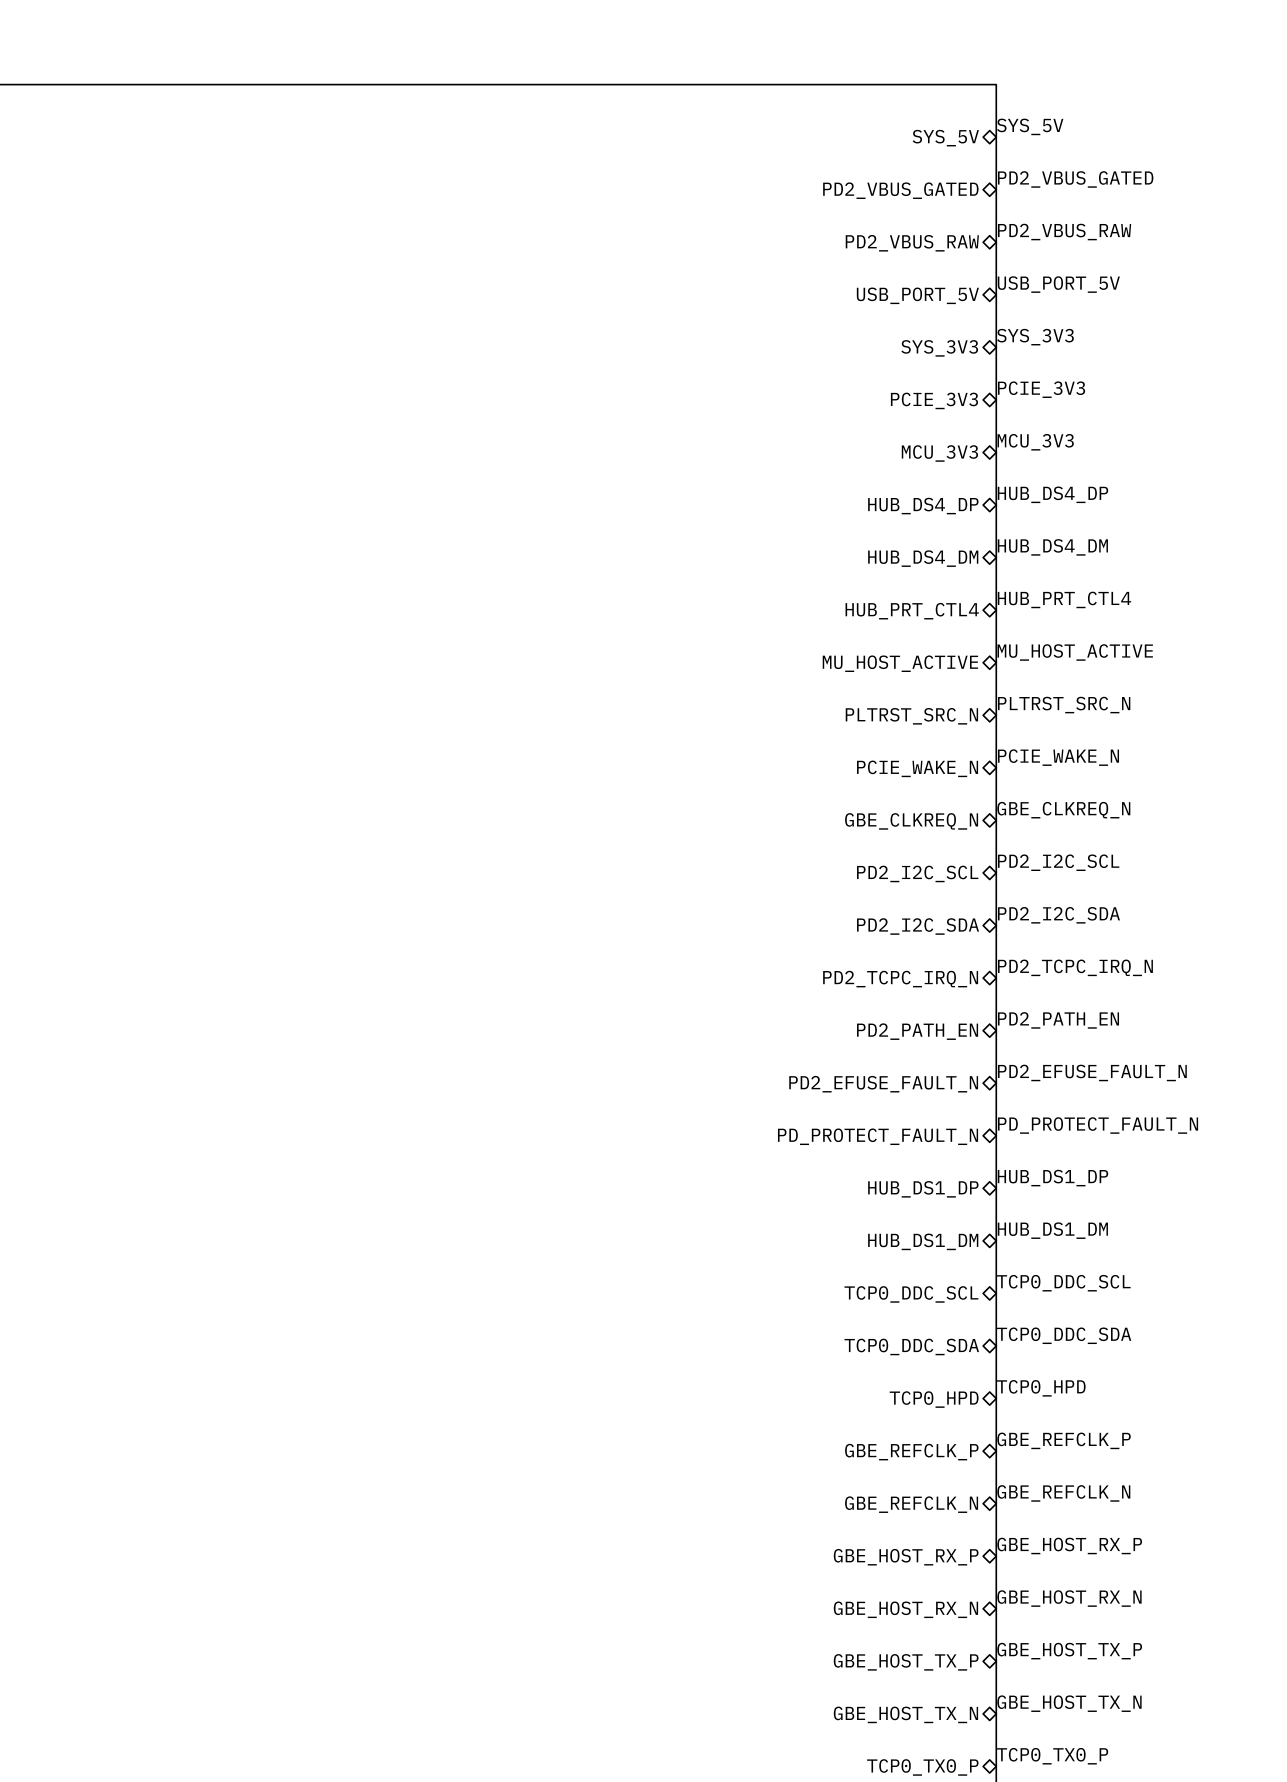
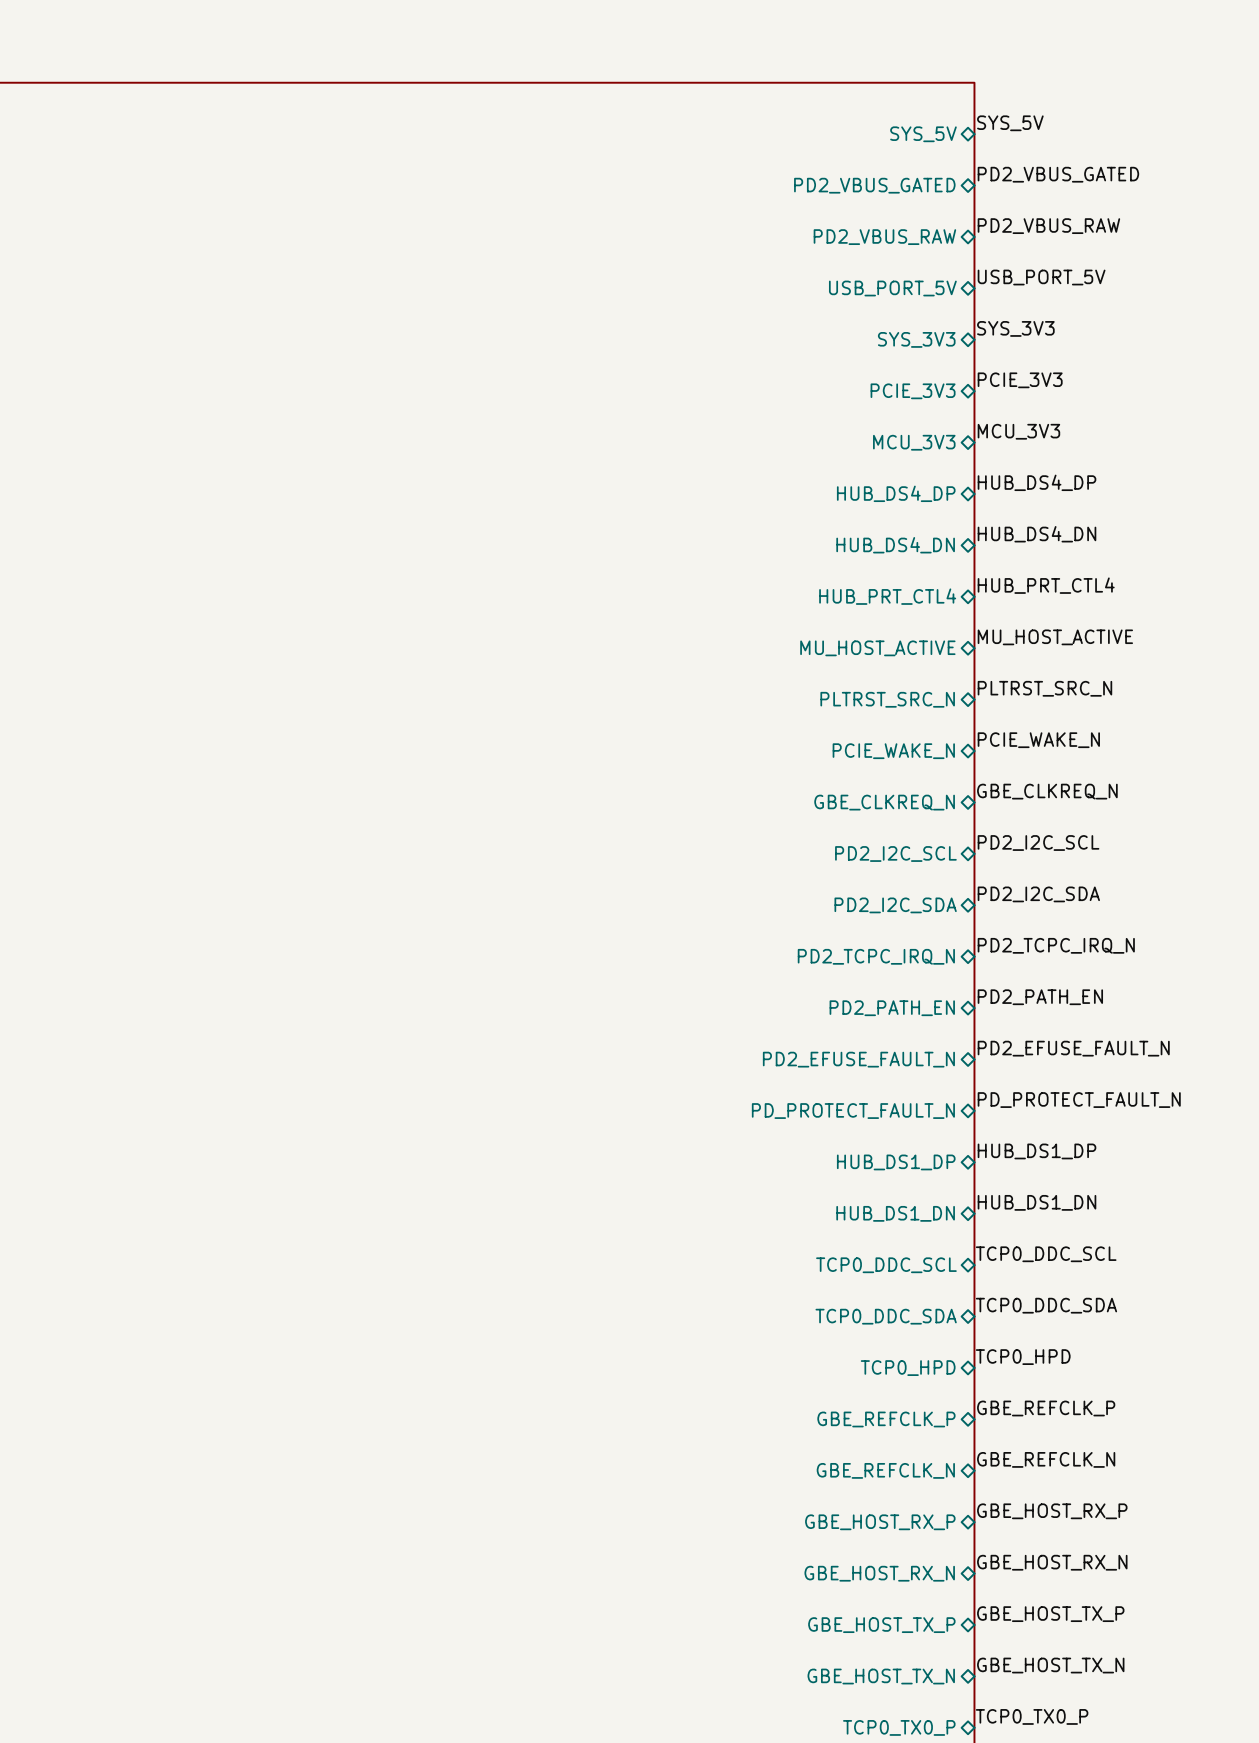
label: HUB_DS4_DM (1052, 547) -> HUB_DS4_DN (1036, 534)
sheet pin: HUB_DS4_DM (923, 558) -> HUB_DS4_DN (895, 545)
label: HUB_DS1_DM (1052, 1230) -> HUB_DS1_DN (1036, 1202)
sheet pin: HUB_DS1_DM (923, 1241) -> HUB_DS1_DN (895, 1213)

